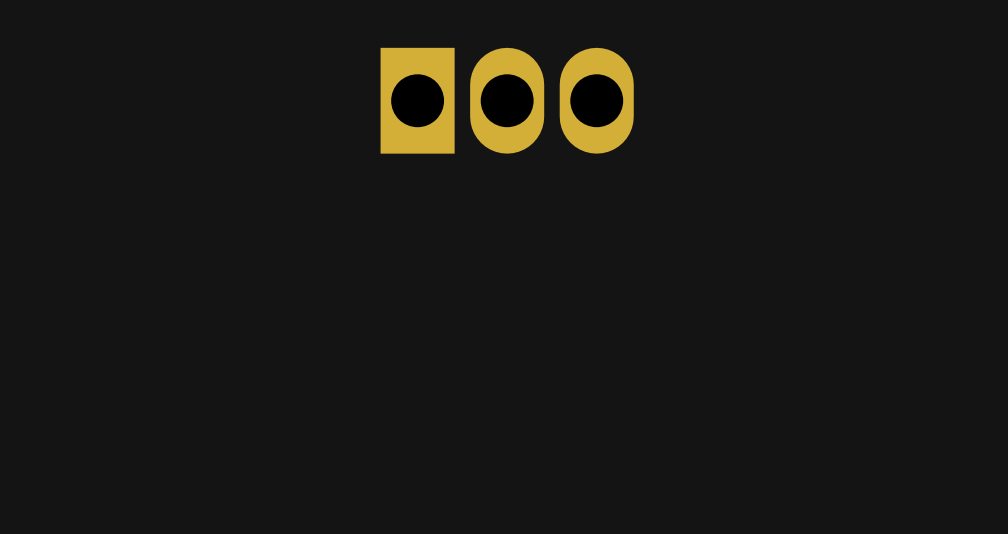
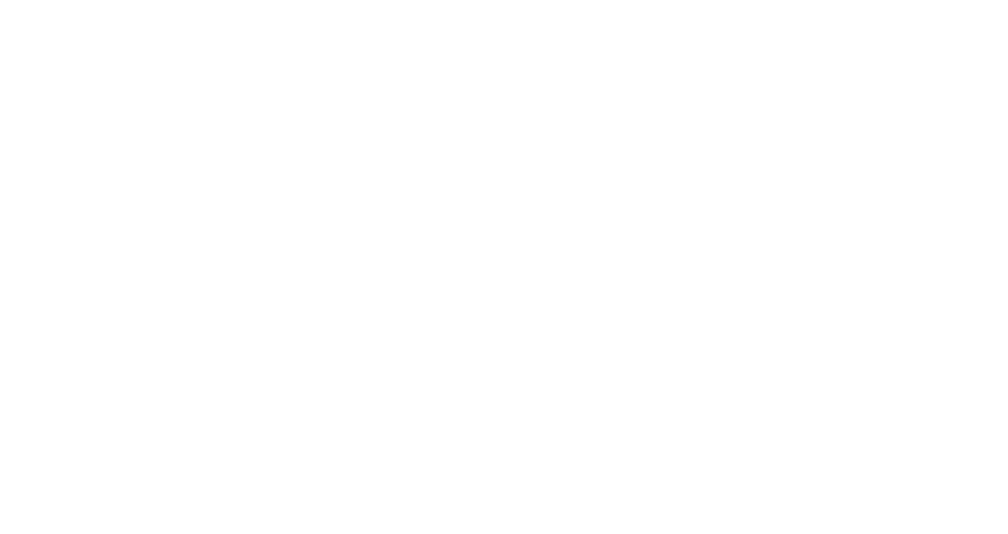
part: (507, 100) -> none

